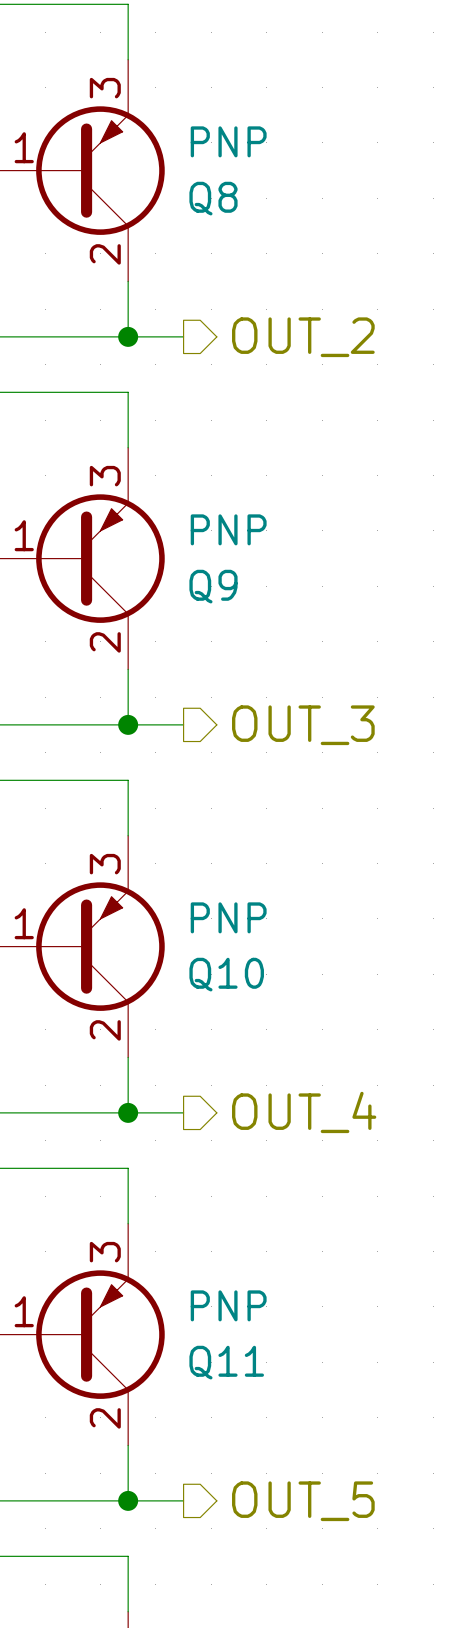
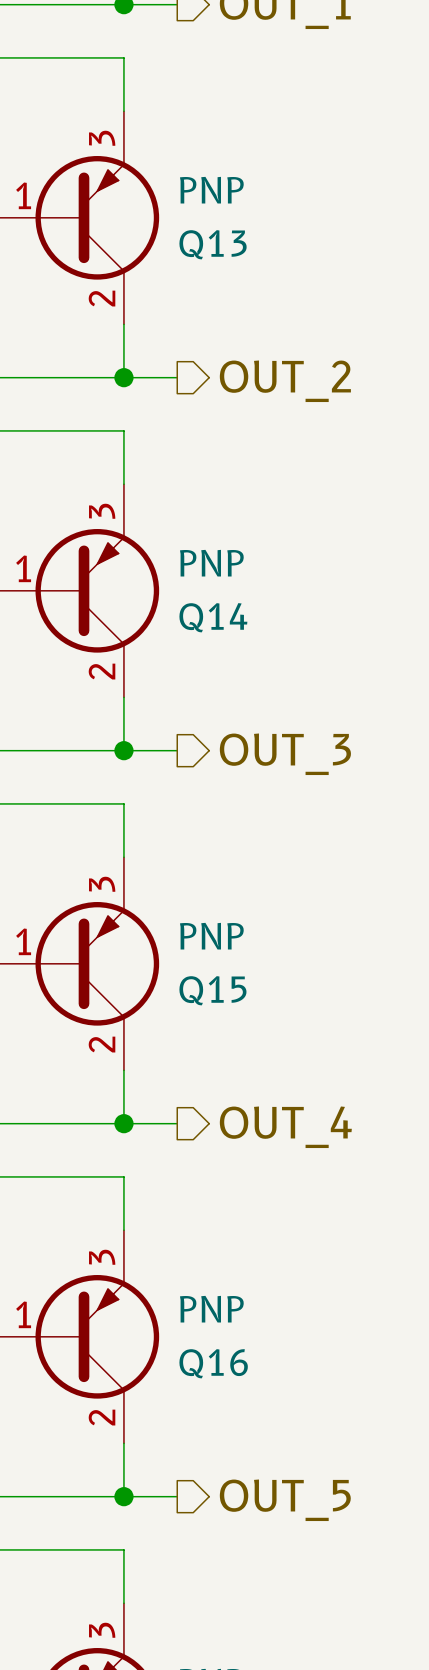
Q8 name: Q8 (213, 198) -> Q13 (213, 244)
Q9 name: Q9 (213, 586) -> Q14 (213, 617)
Q10 name: Q10 (226, 974) -> Q15 (212, 990)
Q11 name: Q11 (226, 1362) -> Q16 (213, 1363)

